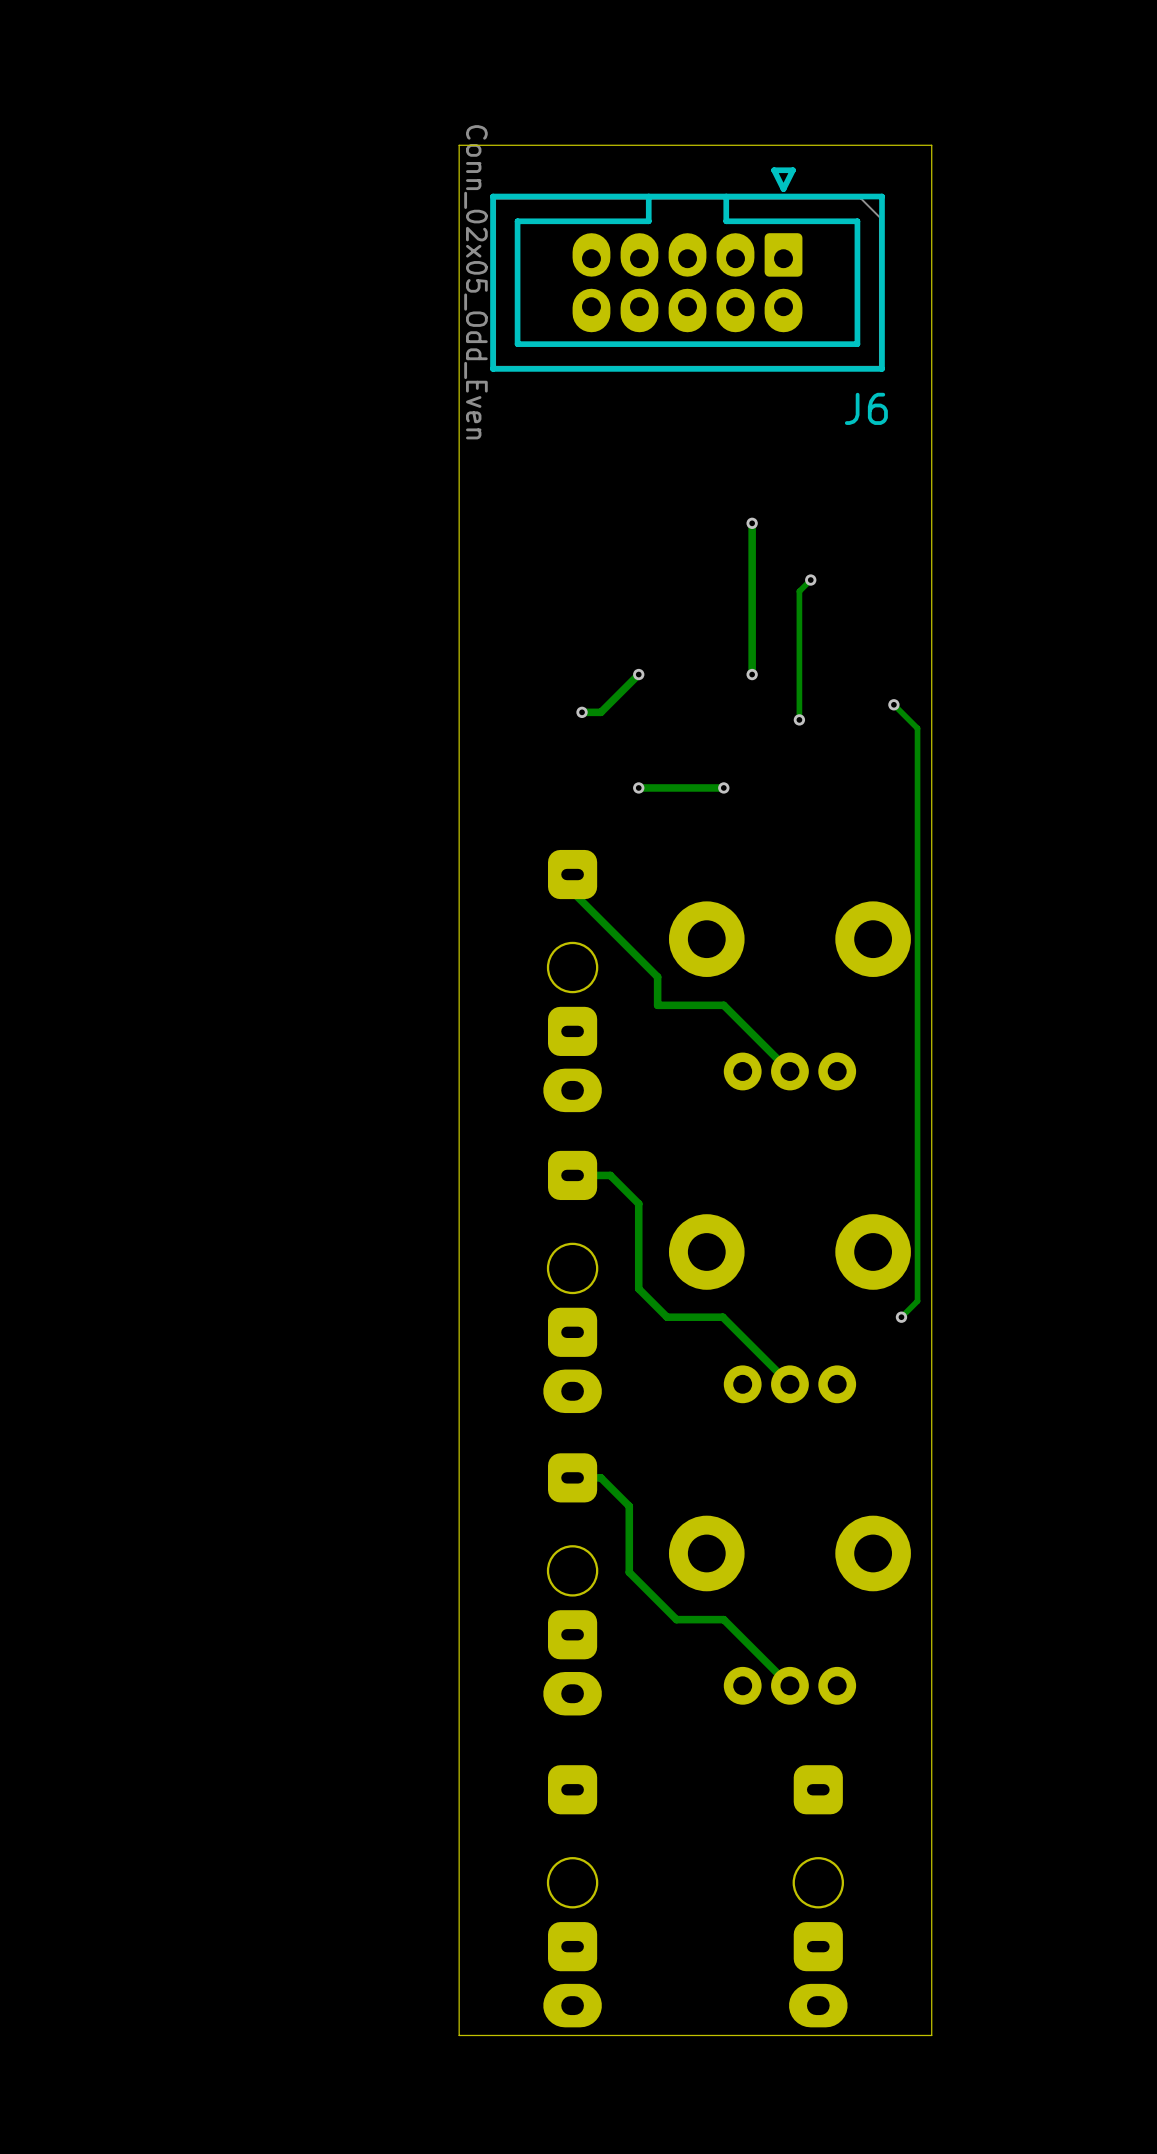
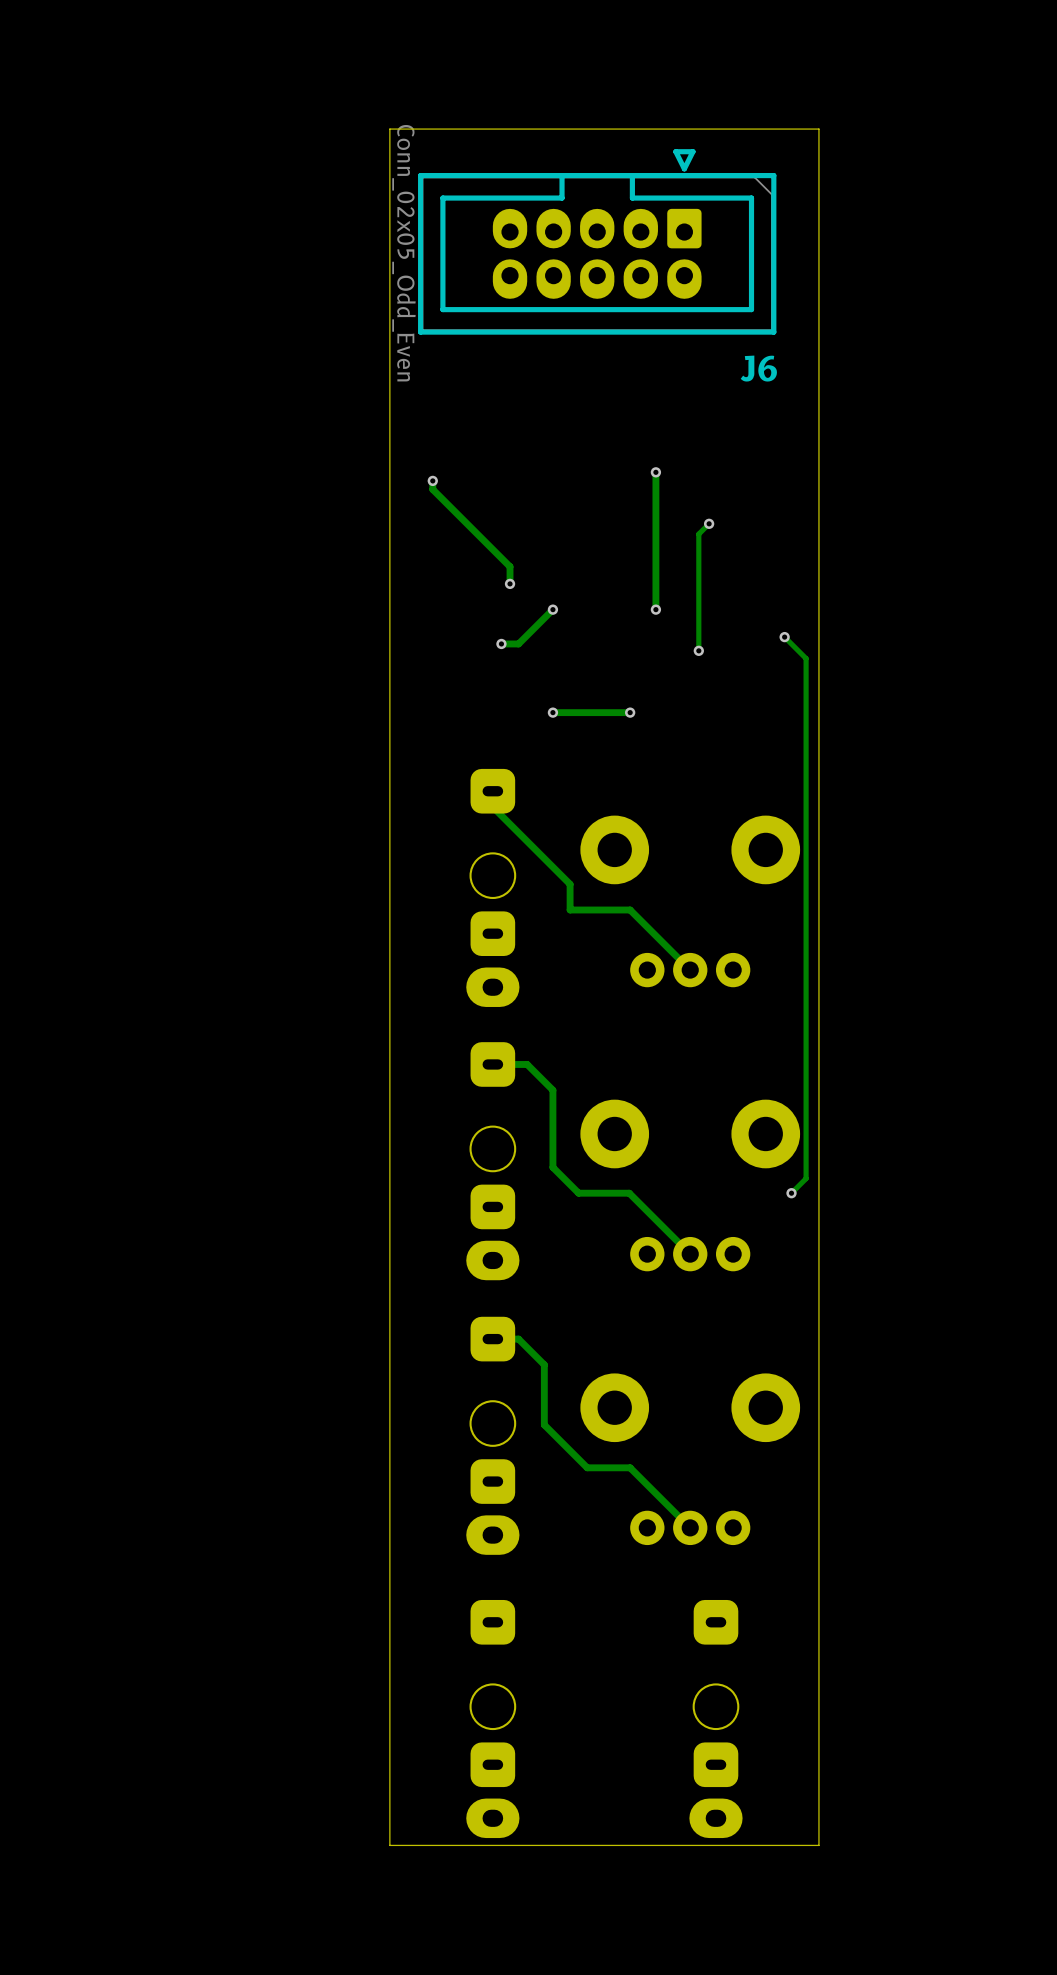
track: none -> (432, 480) (432, 489) (510, 566) (510, 583)
via: none -> (432, 480)
via: none -> (510, 583)

